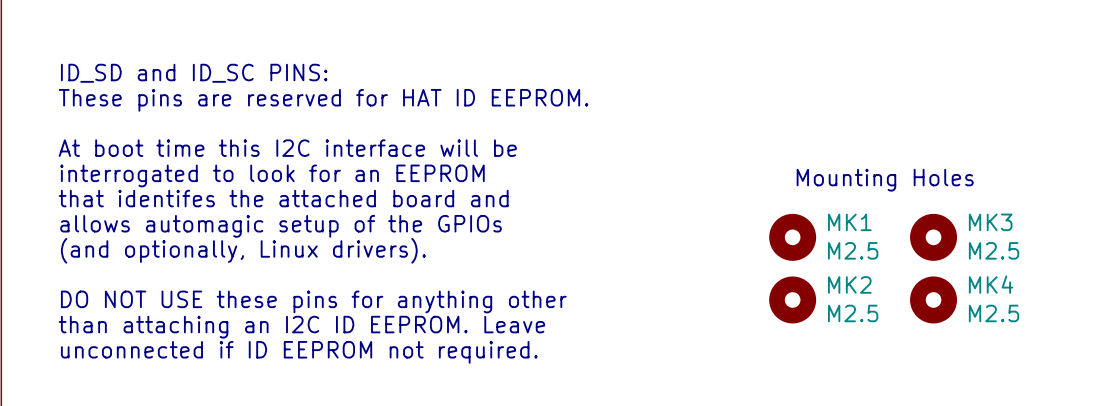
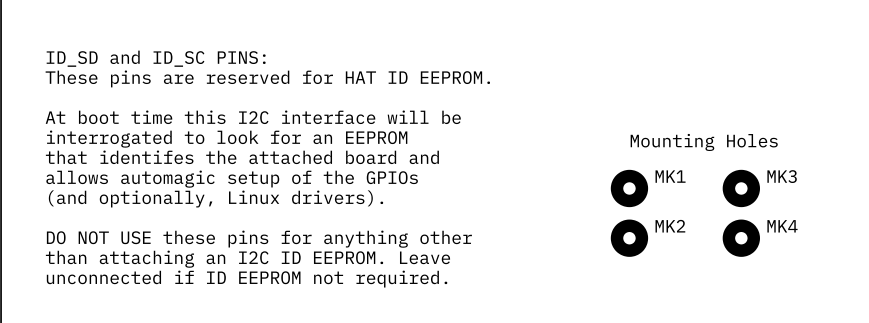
MK1 value: M2.5 (853, 250) -> none
MK3 value: M2.5 (994, 250) -> none
MK2 value: M2.5 (853, 313) -> none
MK4 value: M2.5 (994, 313) -> none

